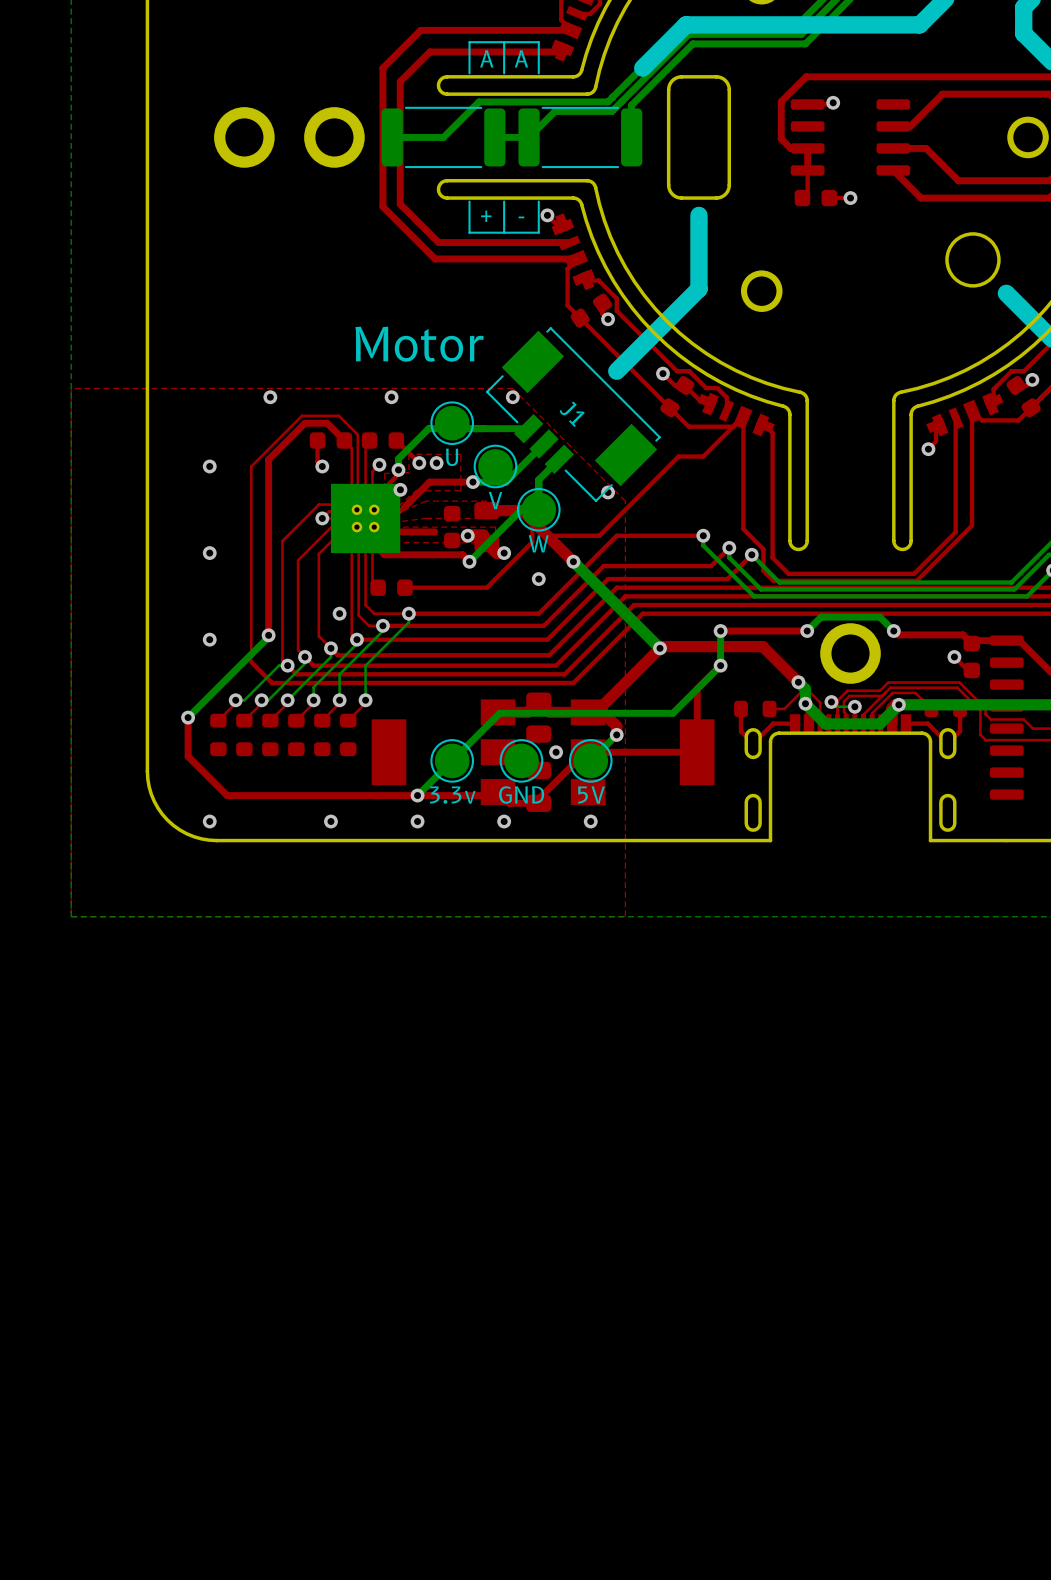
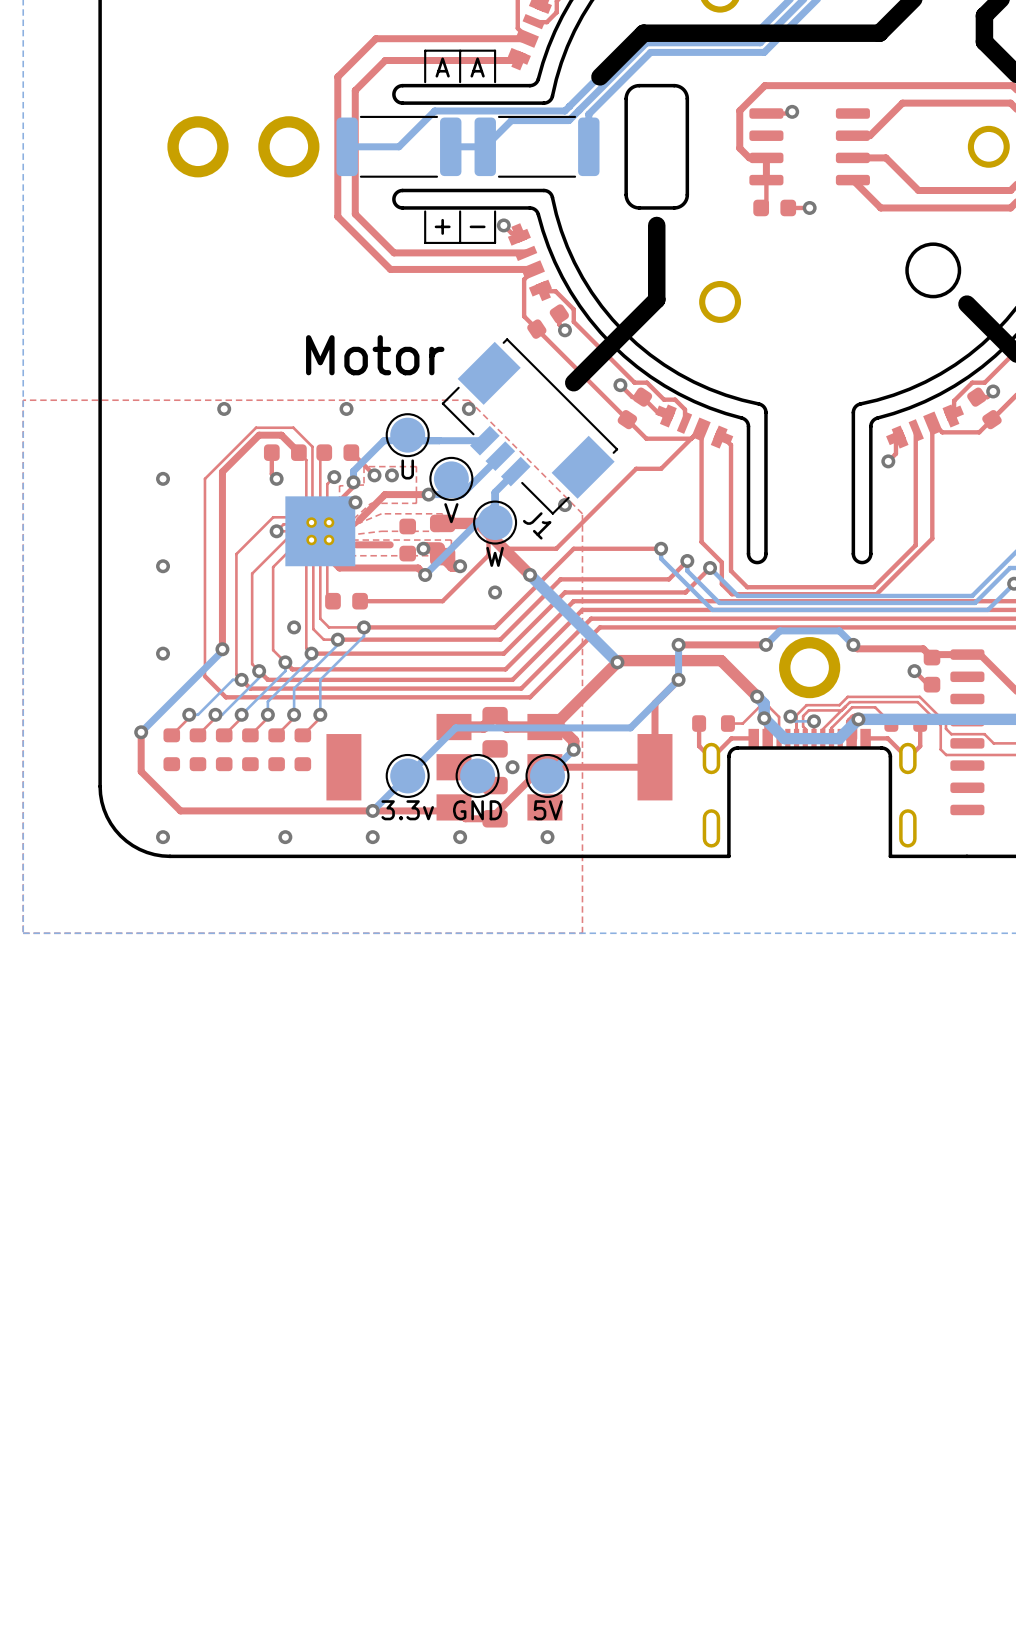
J1 name position: J1 (572, 414) -> J1 (537, 525)

